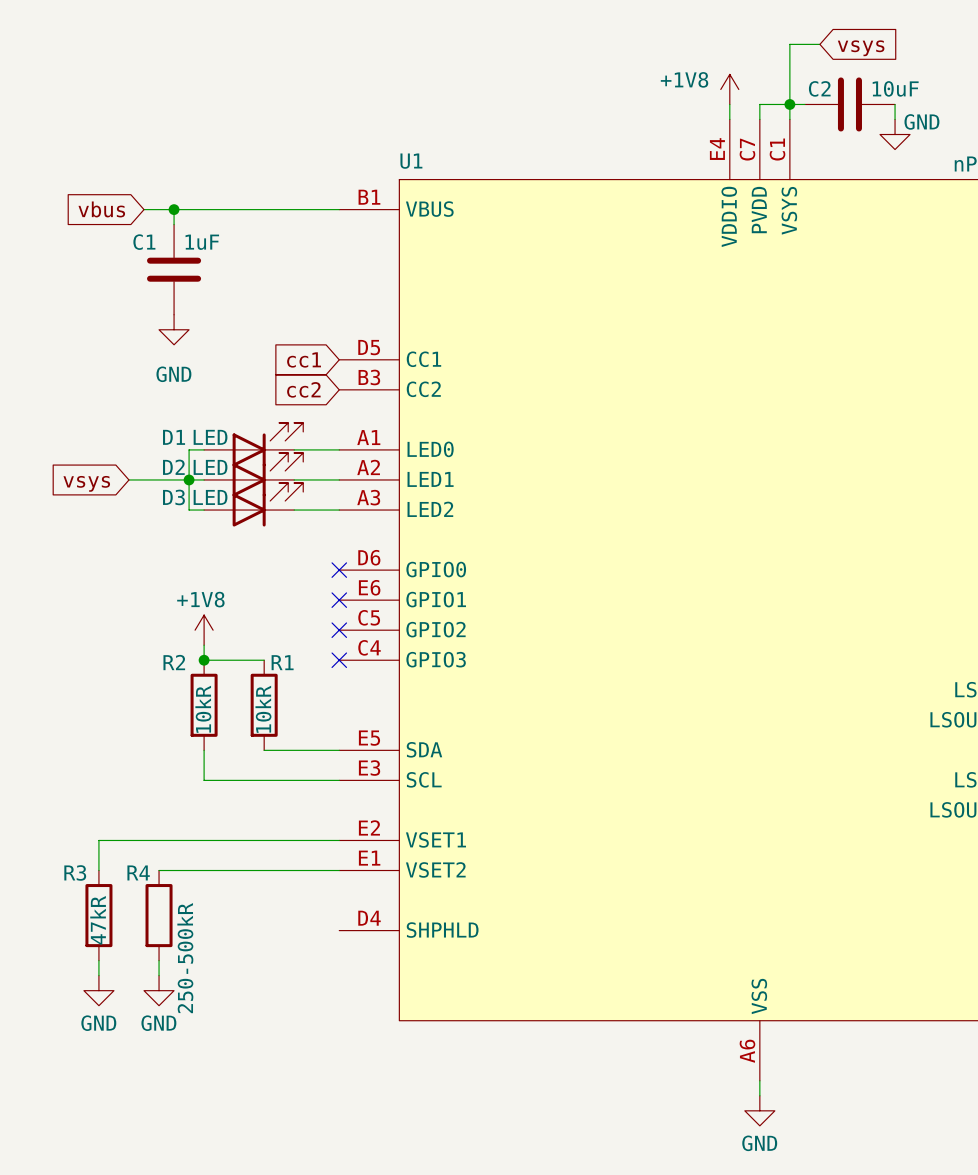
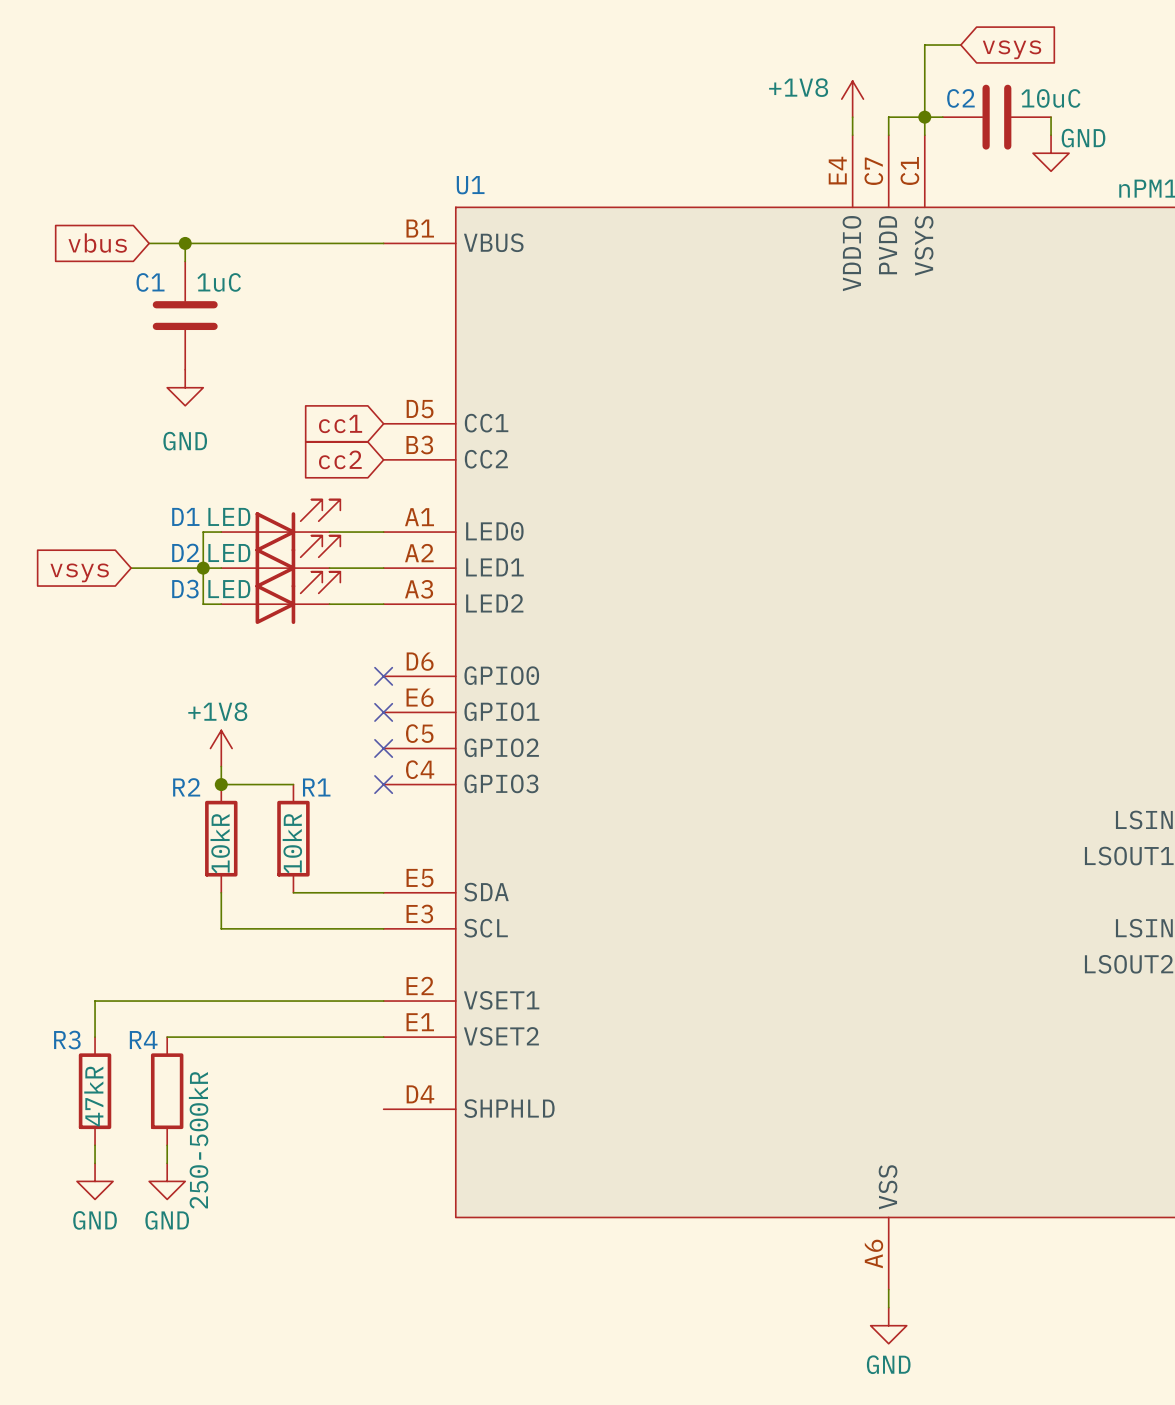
C2 value: 10uF (895, 88) -> 10uC (1050, 98)
C1 value: 1uF (202, 242) -> 1uC (219, 282)

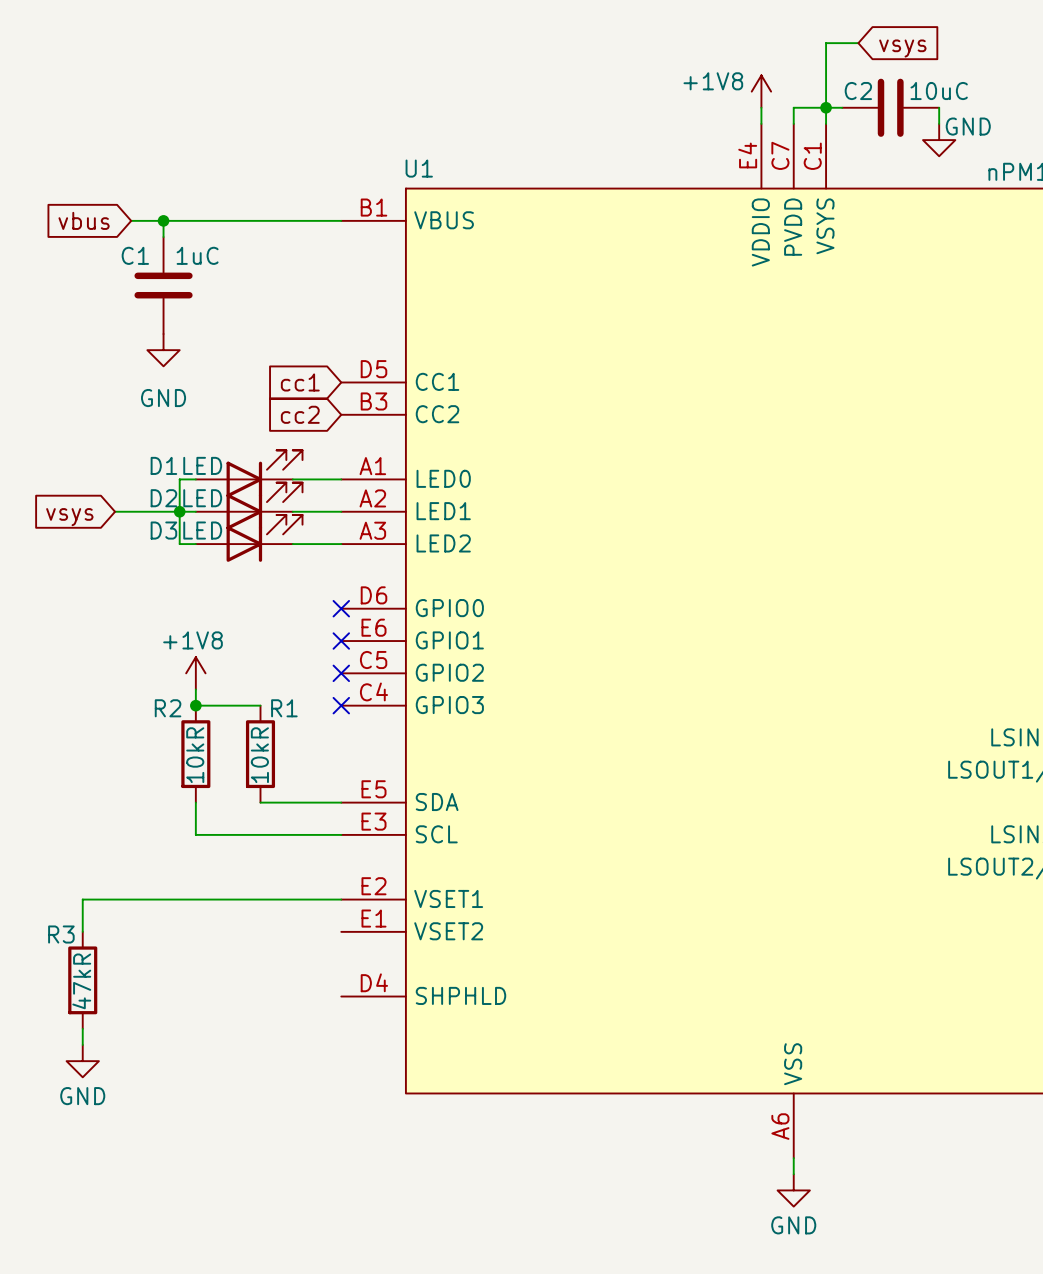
wire: (167, 1037) (383, 1037) -> none
R4: 250-500kR (167, 1091) -> none
wire: (167, 1145) (167, 1163) -> none
power symbol: GND (167, 1181) -> none

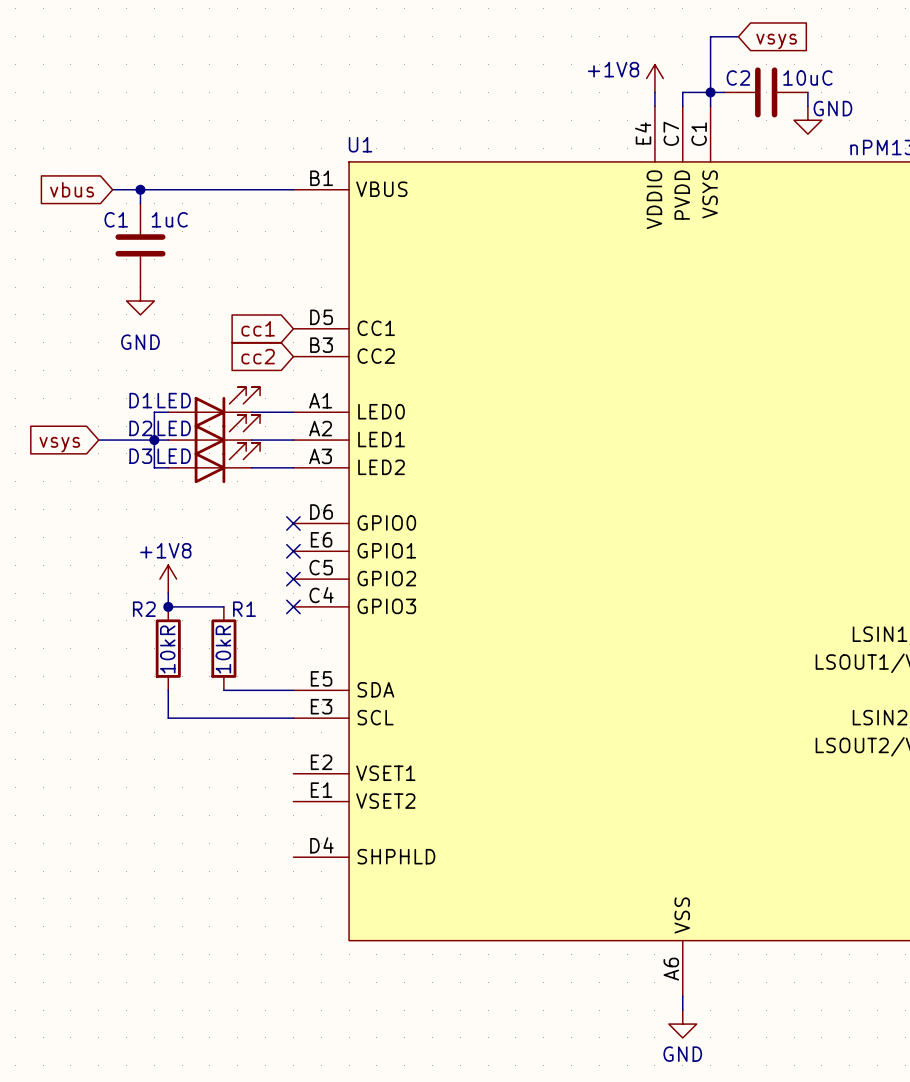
wire: (341, 899) (82, 899) (82, 931) -> none
R3: 47kR (82, 980) -> none
wire: (82, 1028) (82, 1045) -> none
power symbol: GND (82, 1061) -> none

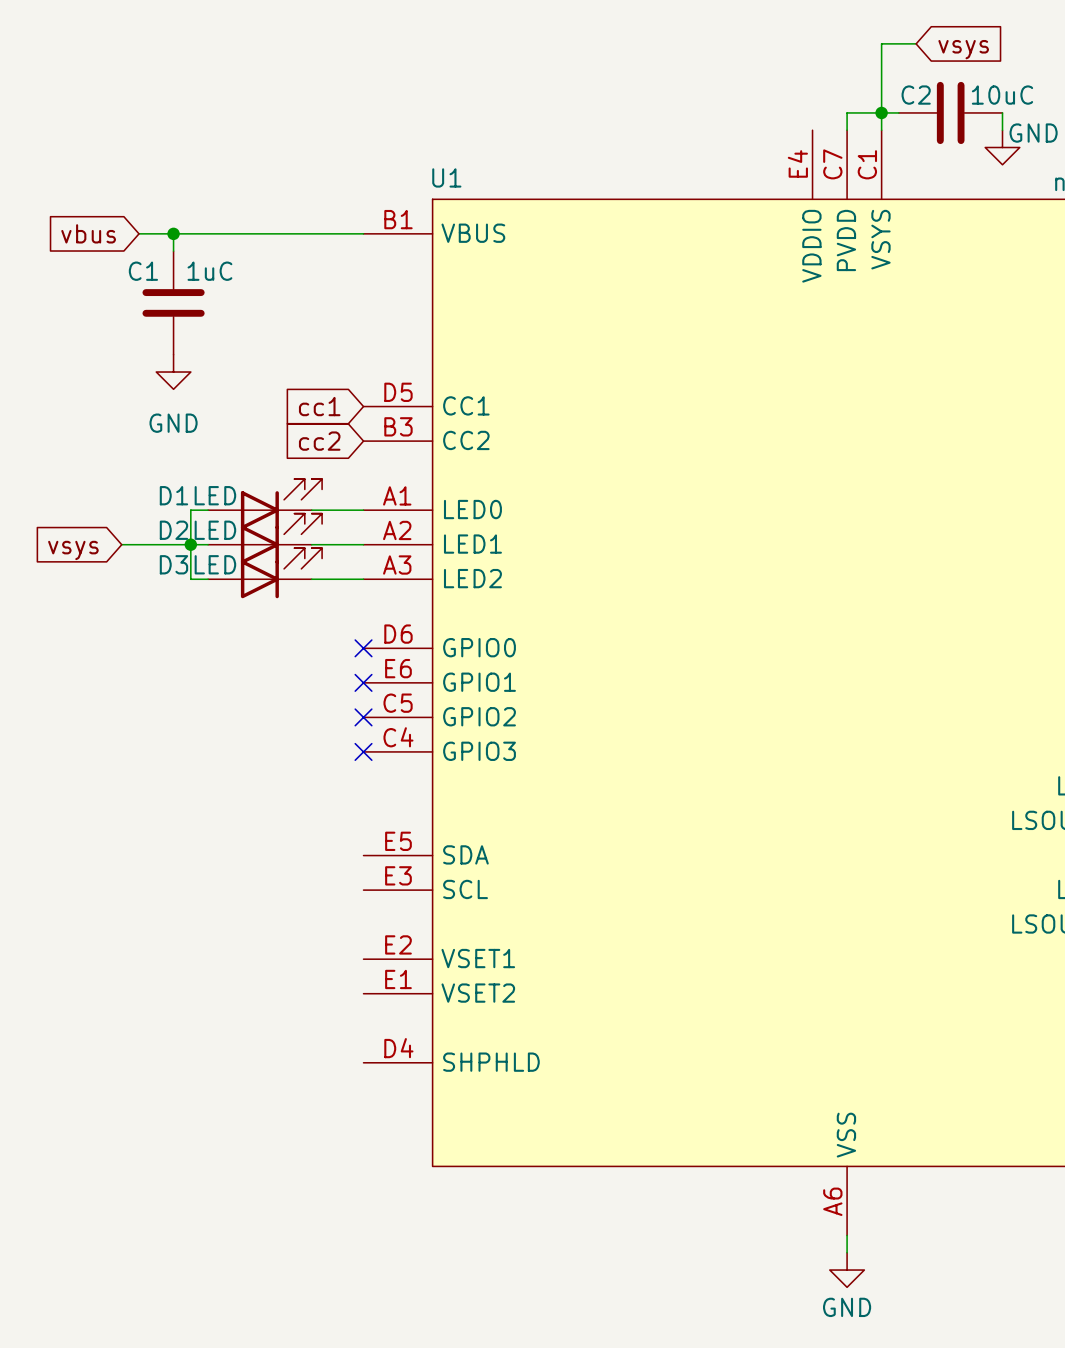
power symbol: +1V8 (654, 78) -> none
wire: (654, 92) (654, 106) -> none
power symbol: +1V8 (168, 579) -> none
wire: (168, 593) (168, 606) (223, 606) -> none
junction: (168, 606) -> none
R2: 10kR (168, 648) -> none
R1: 10kR (223, 648) -> none
wire: (168, 690) (168, 718) (293, 718) -> none
wire: (223, 690) (293, 690) -> none

